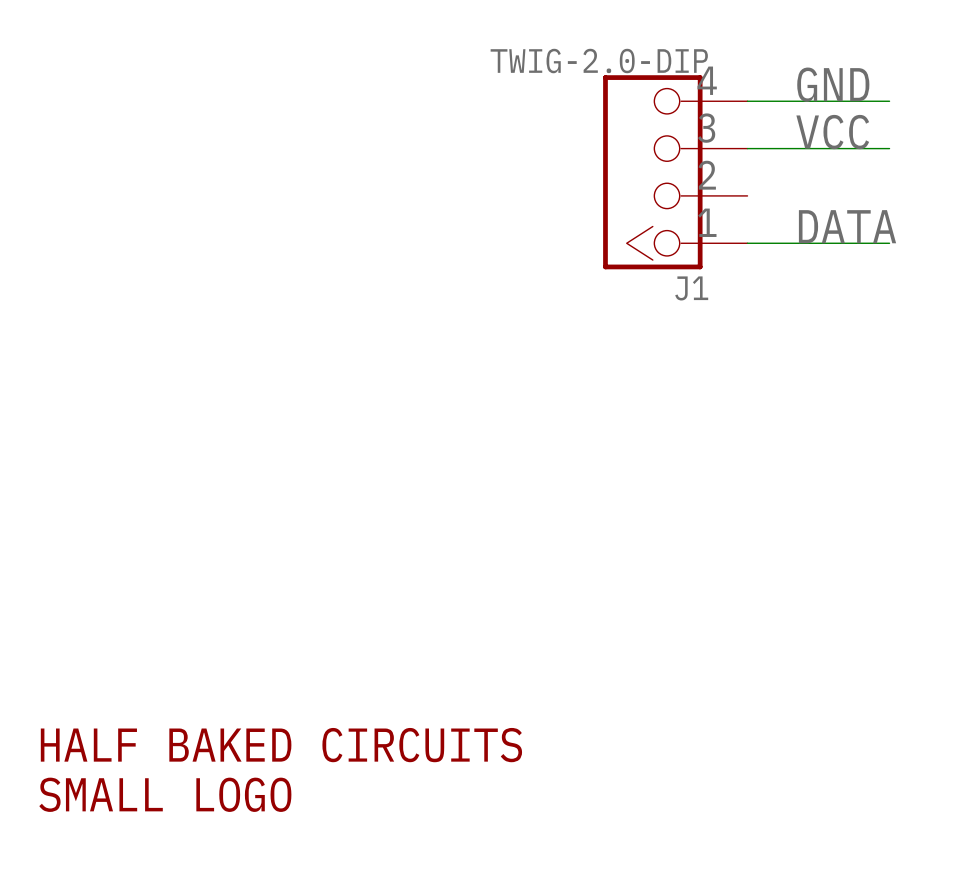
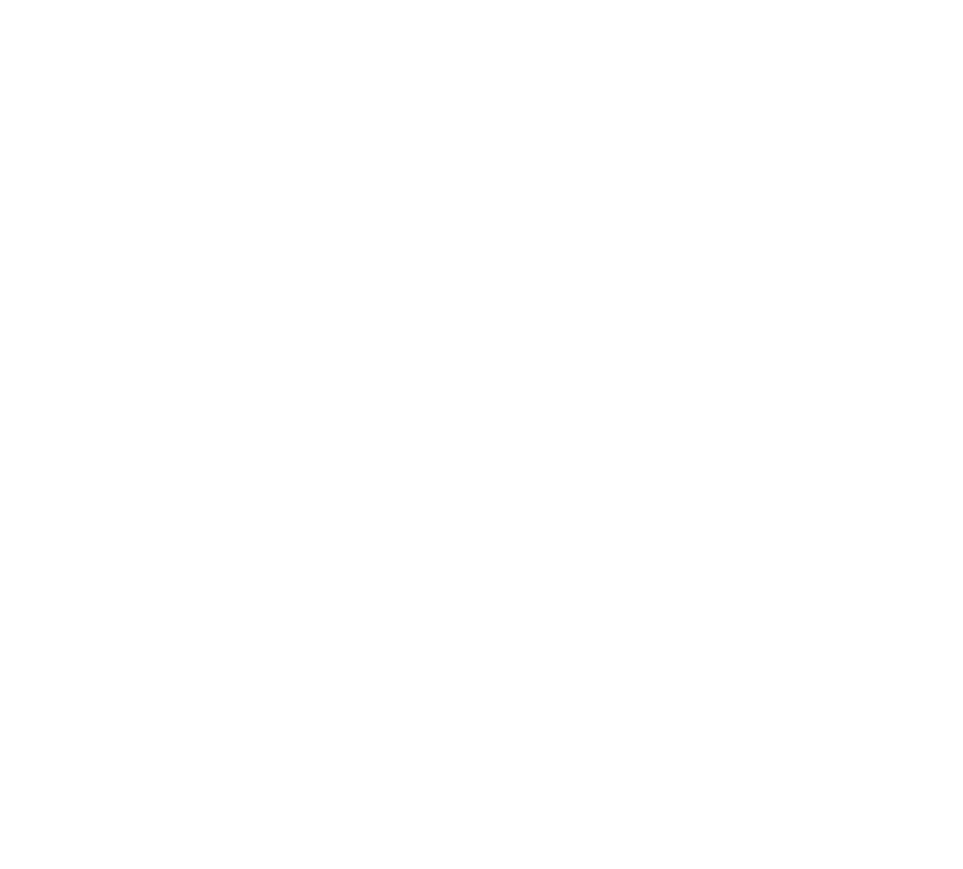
label: GND (833, 84) -> none
wire: (747, 101) (889, 101) -> none
label: VCC (832, 132) -> none
wire: (747, 148) (889, 148) -> none
J1: TWIG-2.0-DIP (675, 172) -> none
label: DATA (847, 226) -> none
wire: (747, 243) (889, 243) -> none
part: (280, 769) -> none

